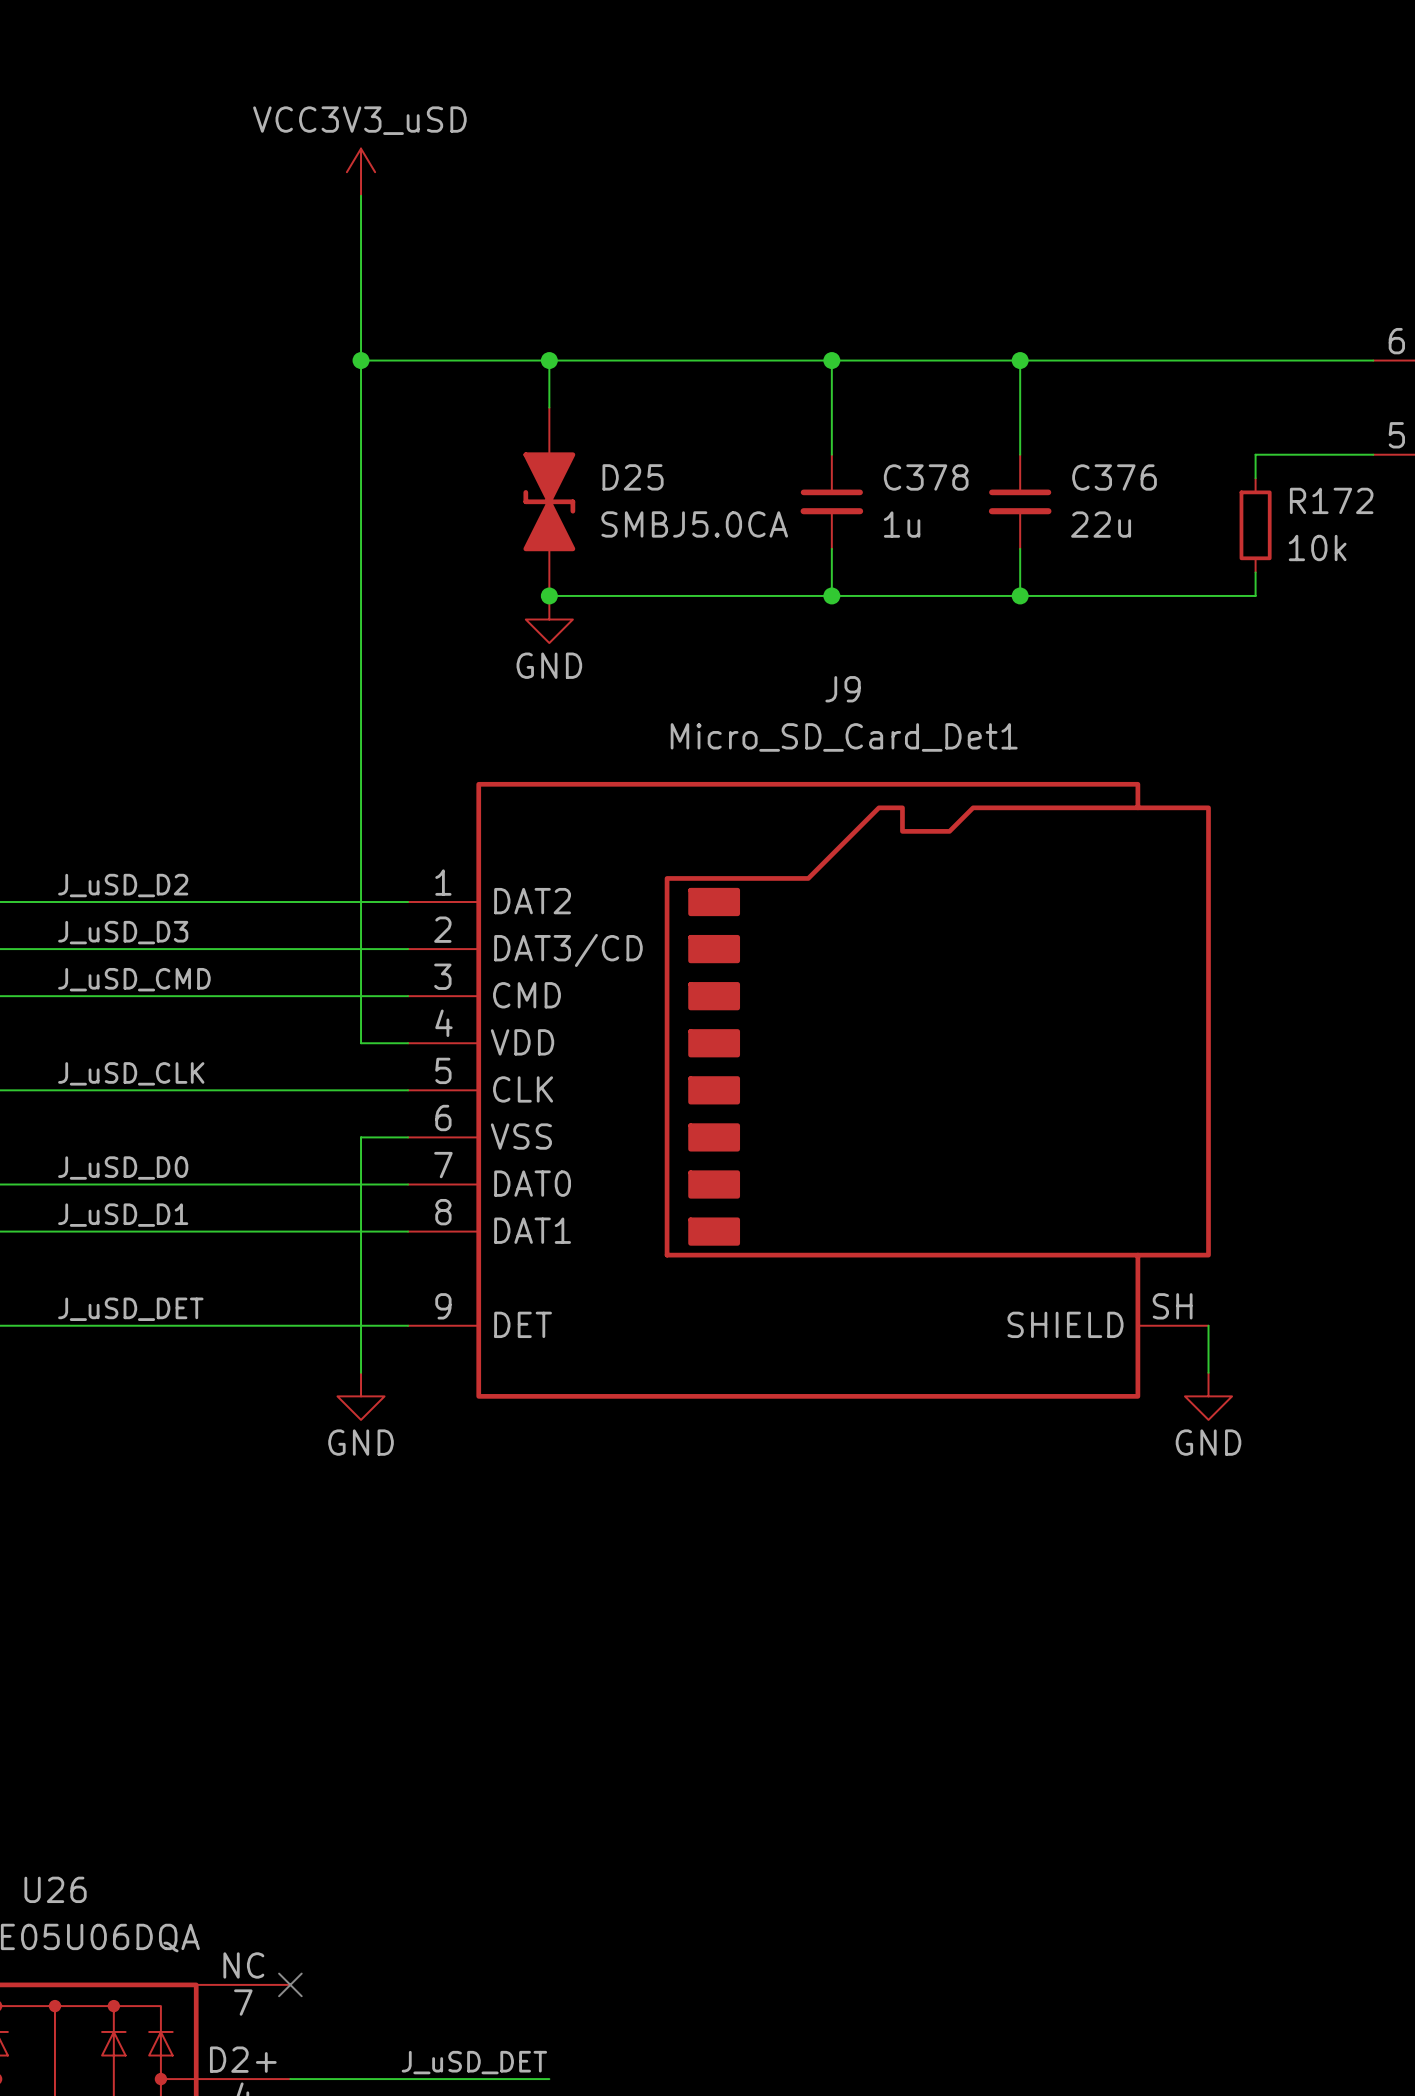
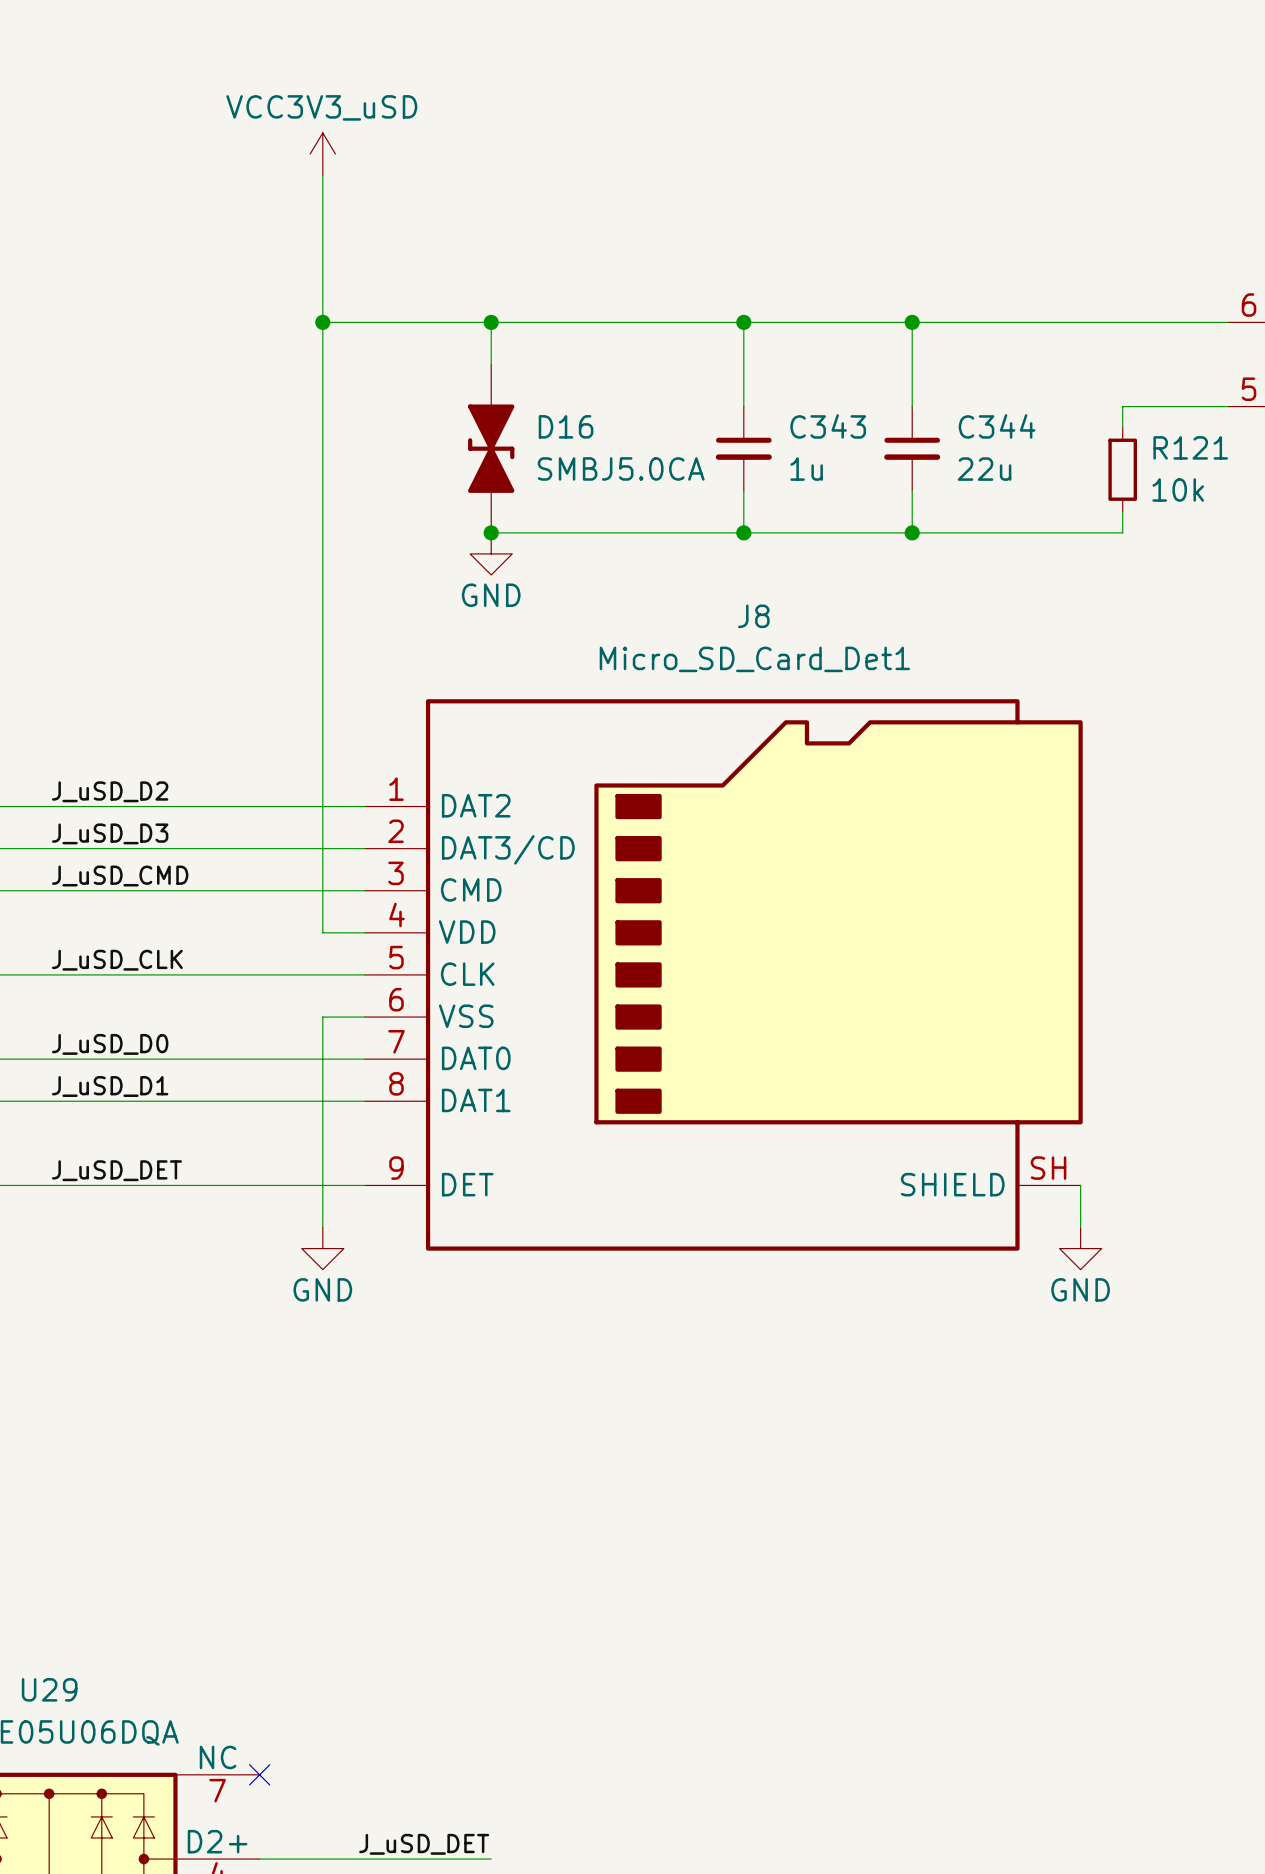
D25 name: D25 (633, 477) -> D16 (566, 426)
C378 name: C378 (926, 477) -> C343 (828, 426)
C376 name: C376 (1114, 477) -> C344 (997, 426)
R172 name: R172 (1331, 500) -> R121 (1190, 447)
J9 name: J9 (843, 689) -> J8 (753, 616)
U26 name: U26 (55, 1889) -> U29 (49, 1689)

